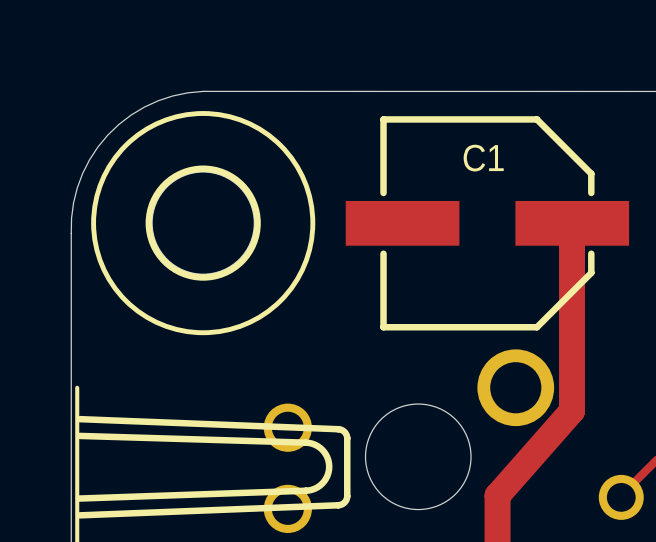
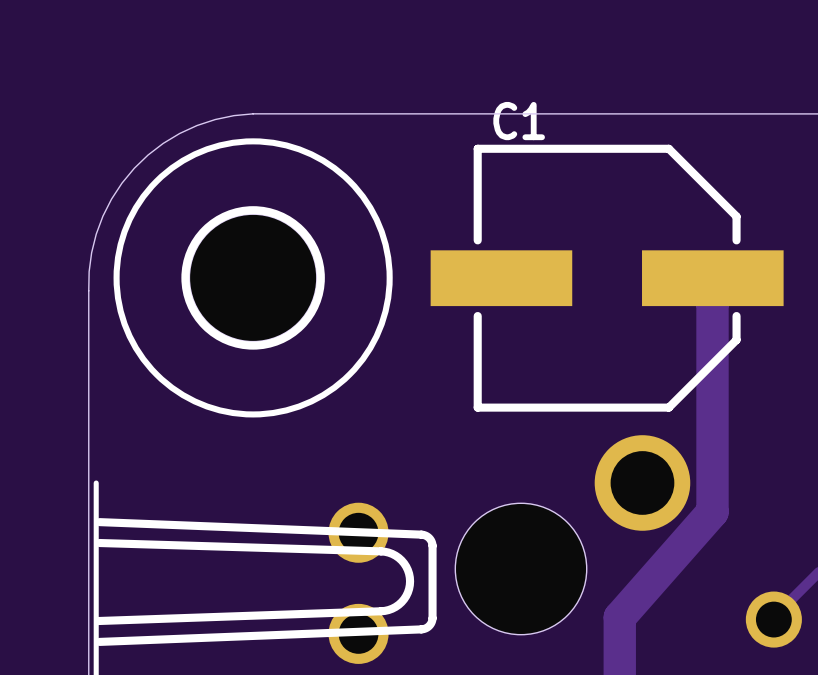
C1 name position: C1 (483, 158) -> C1 (519, 121)

